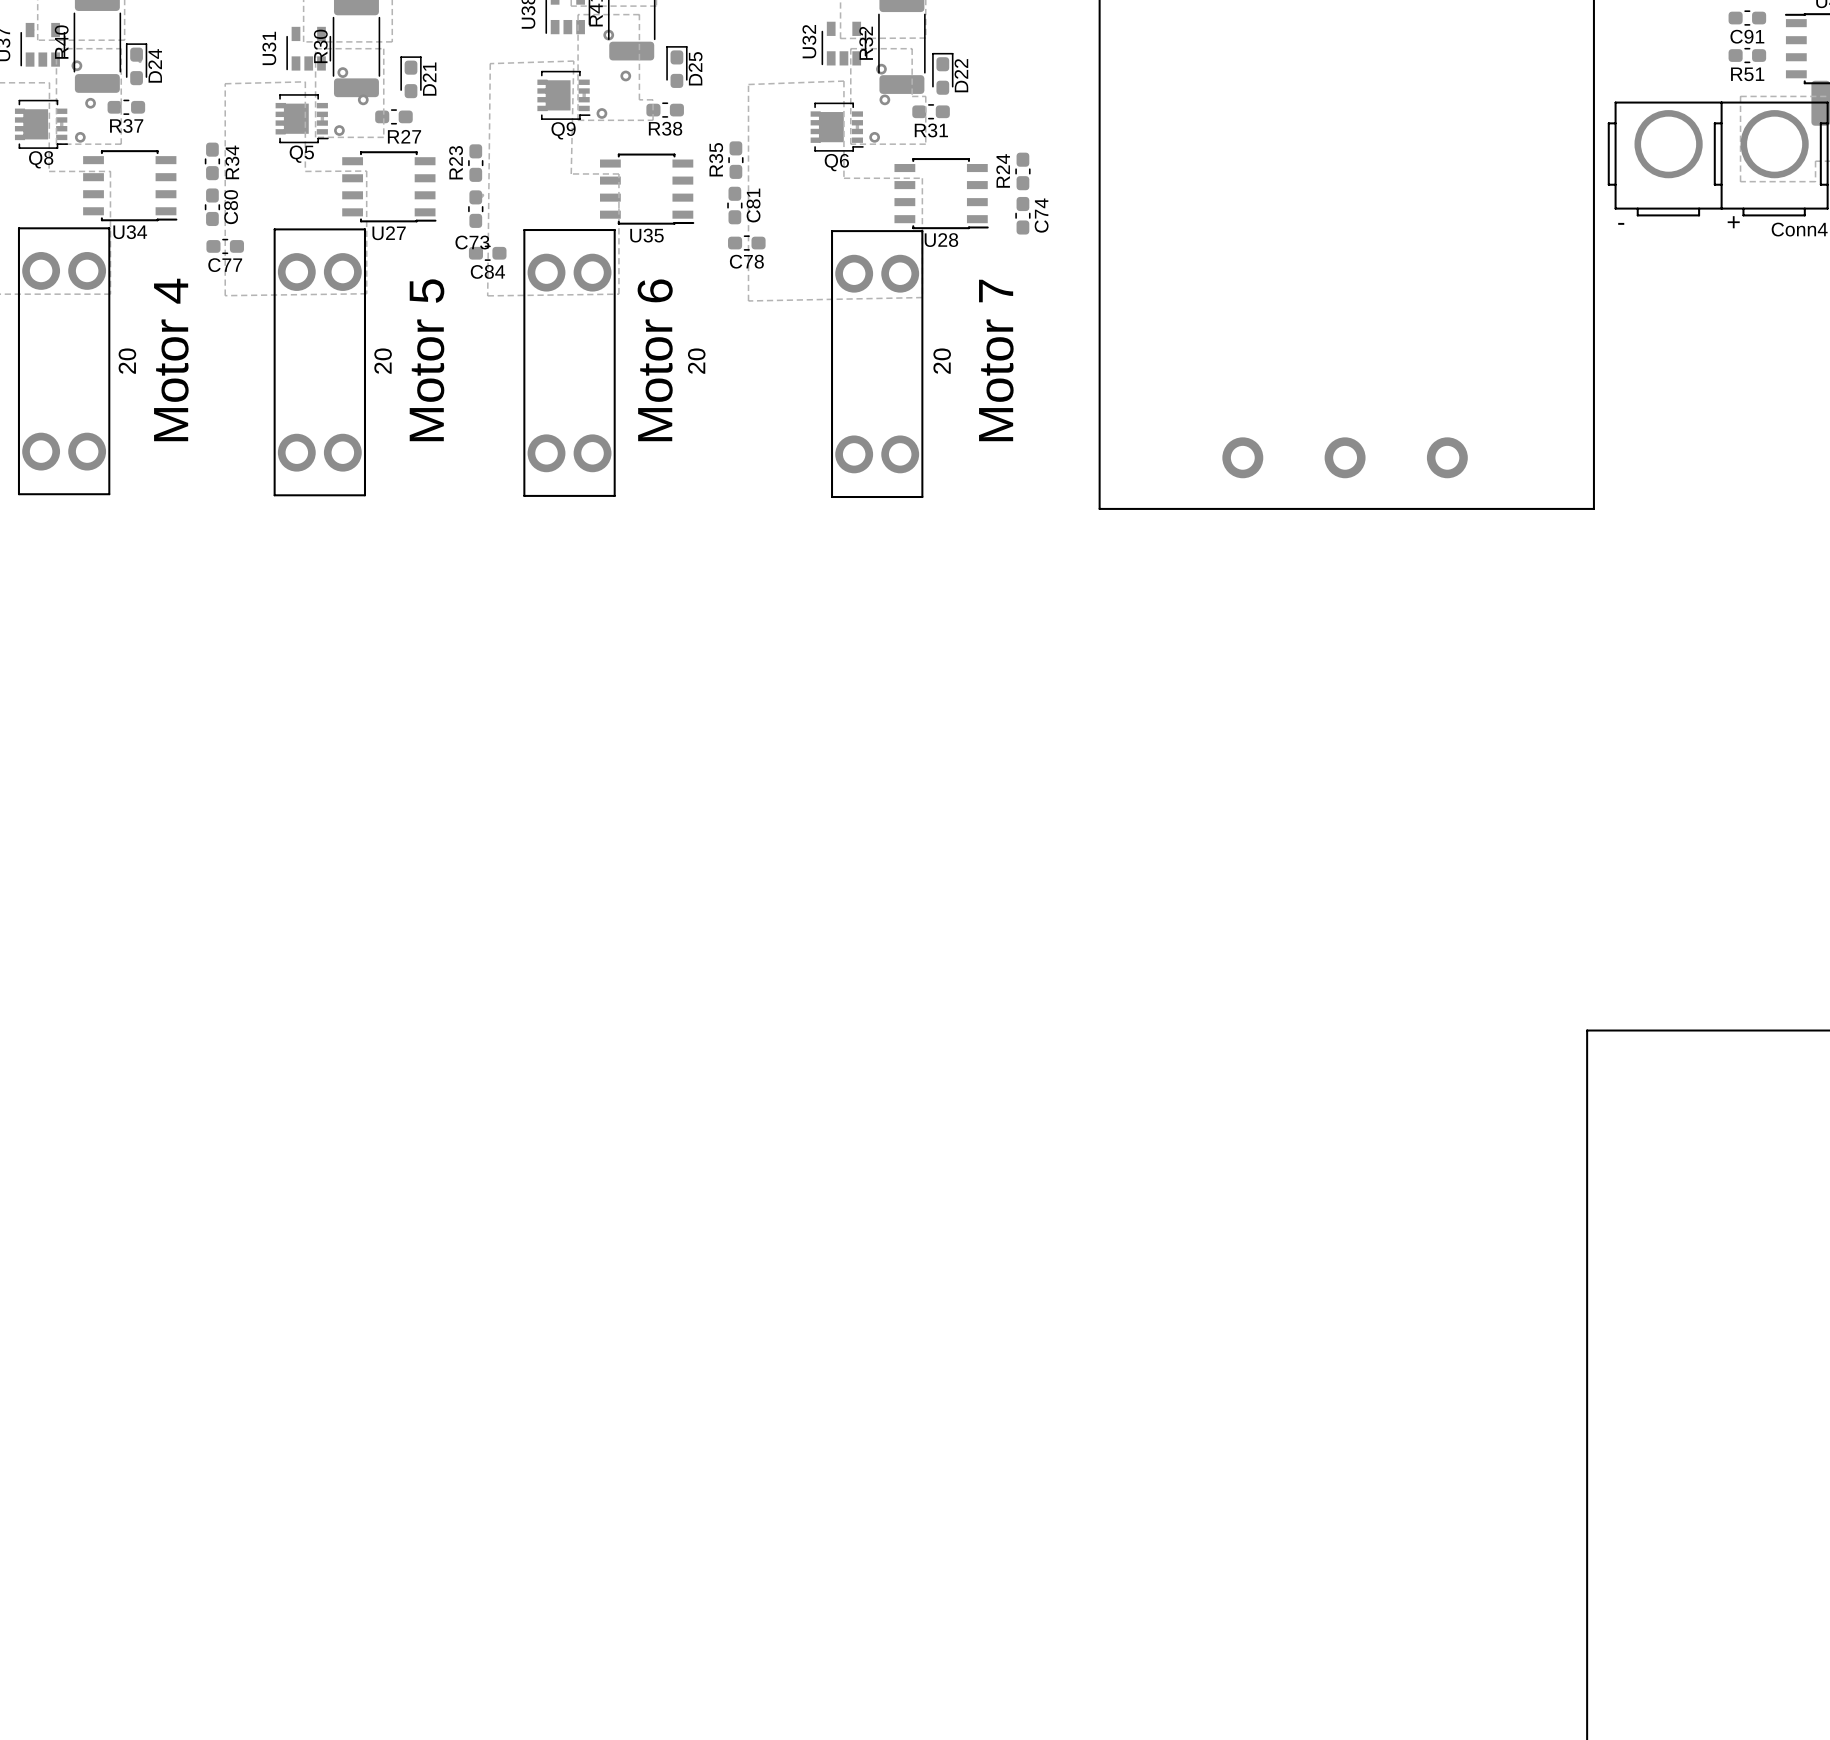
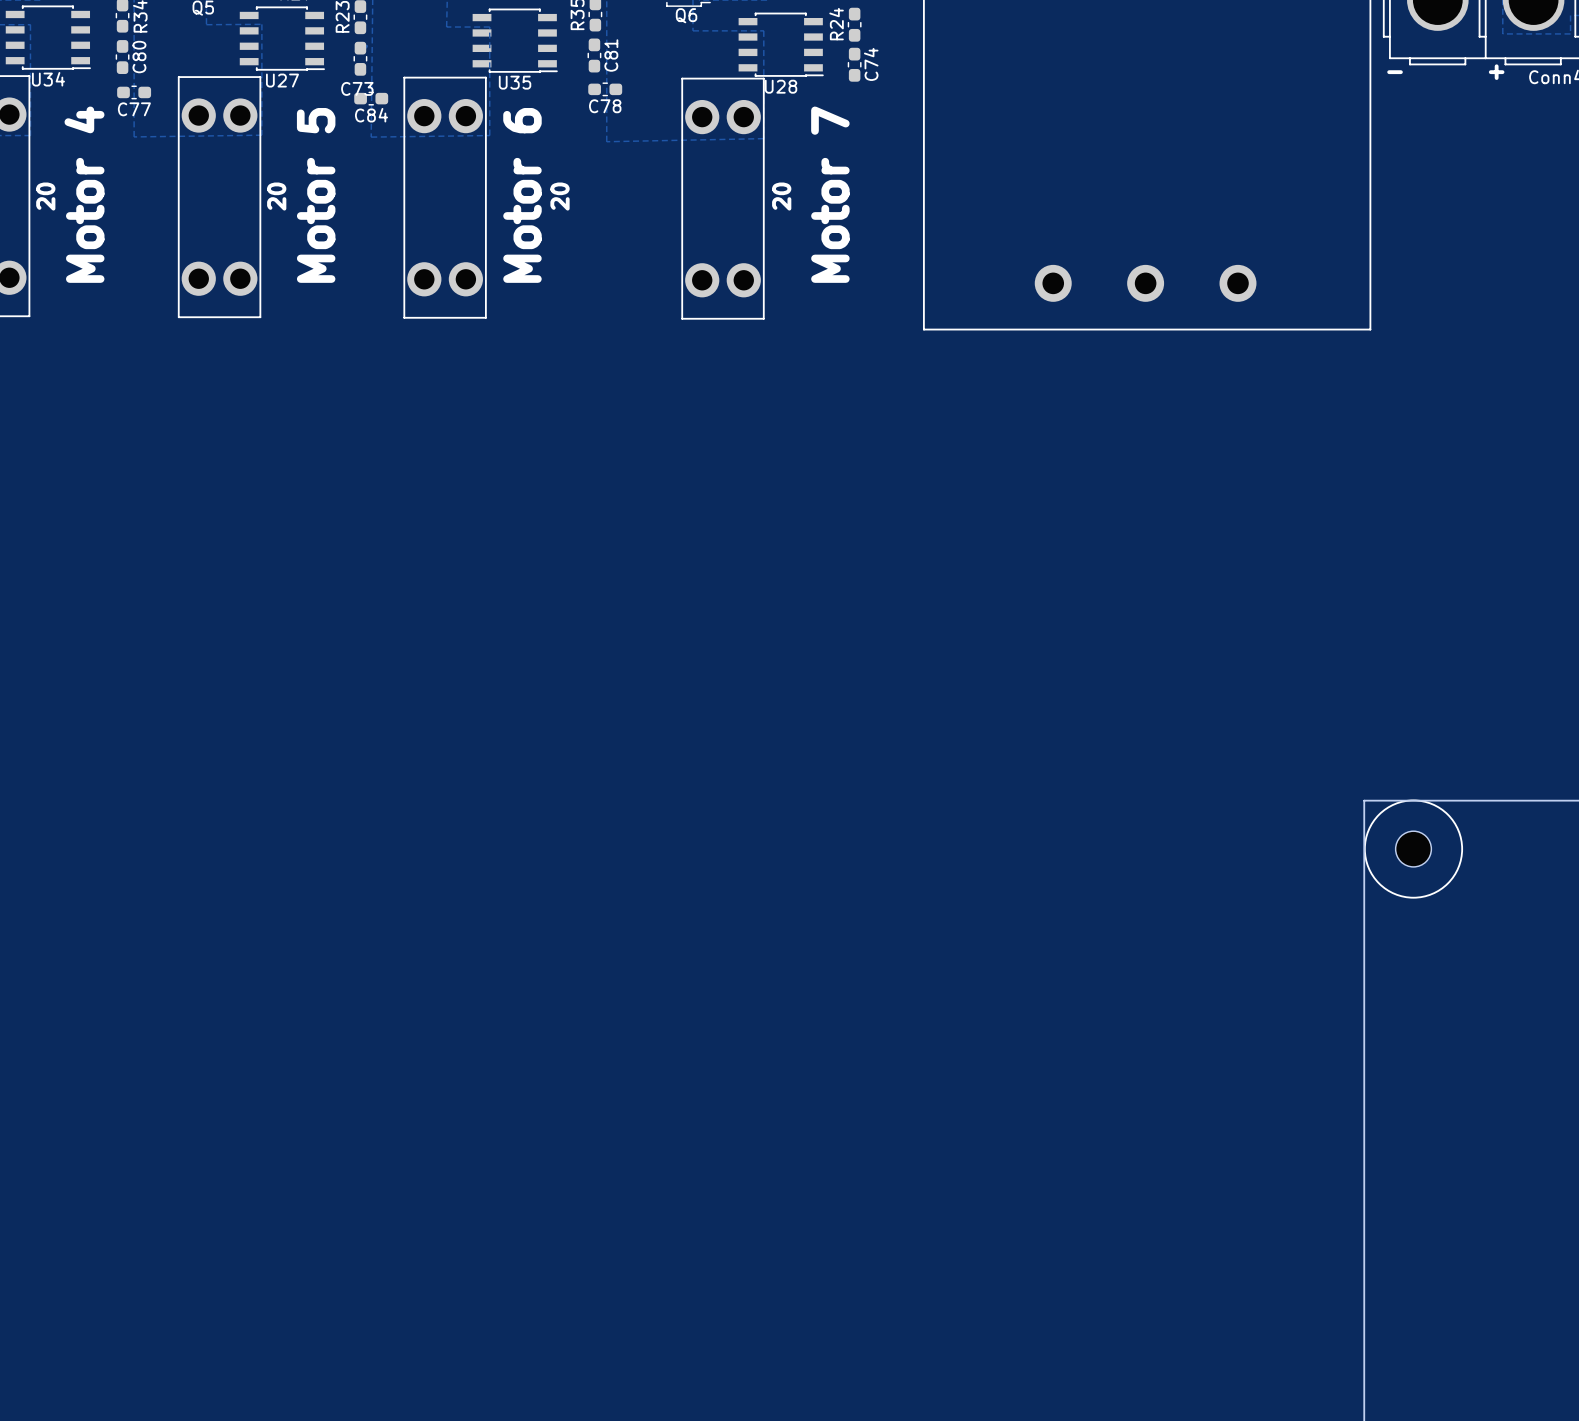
part: none -> (1413, 849)

